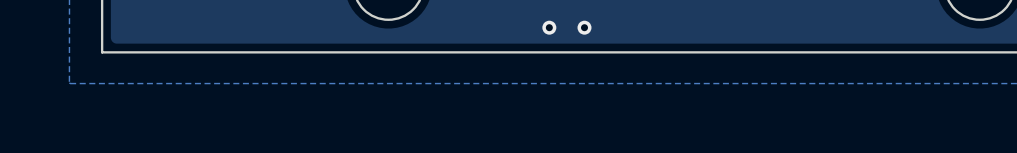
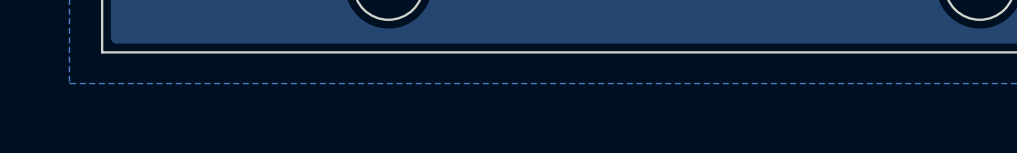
via: (549, 27) -> none
via: (584, 27) -> none

